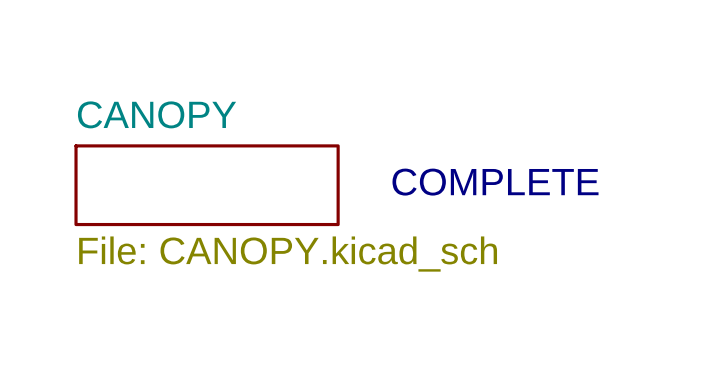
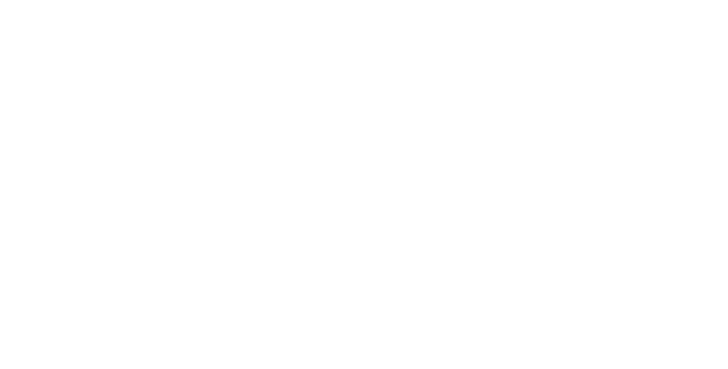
text: COMPLETE (495, 182) -> none
sheet CANOPY: File: CANOPY.kicad_sch (207, 185) -> none

